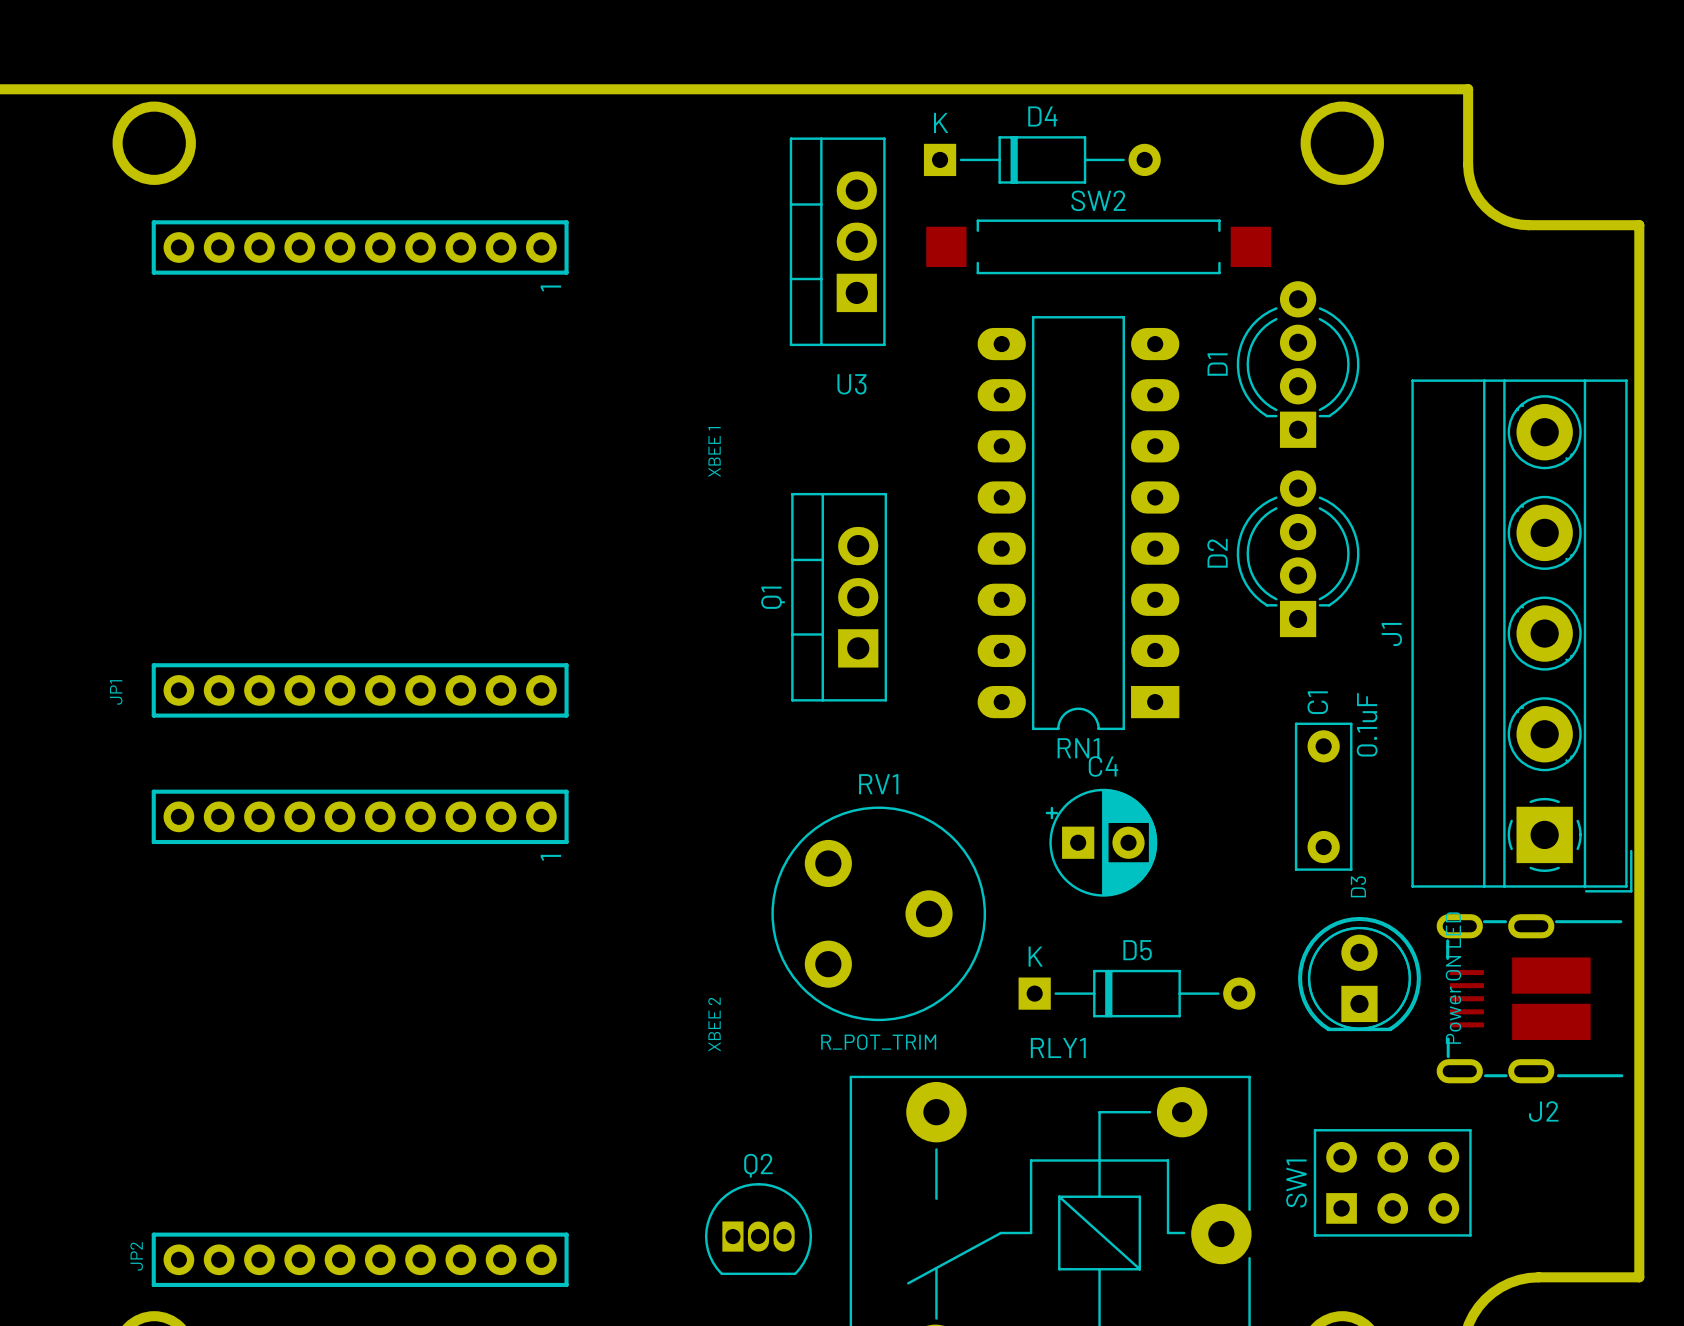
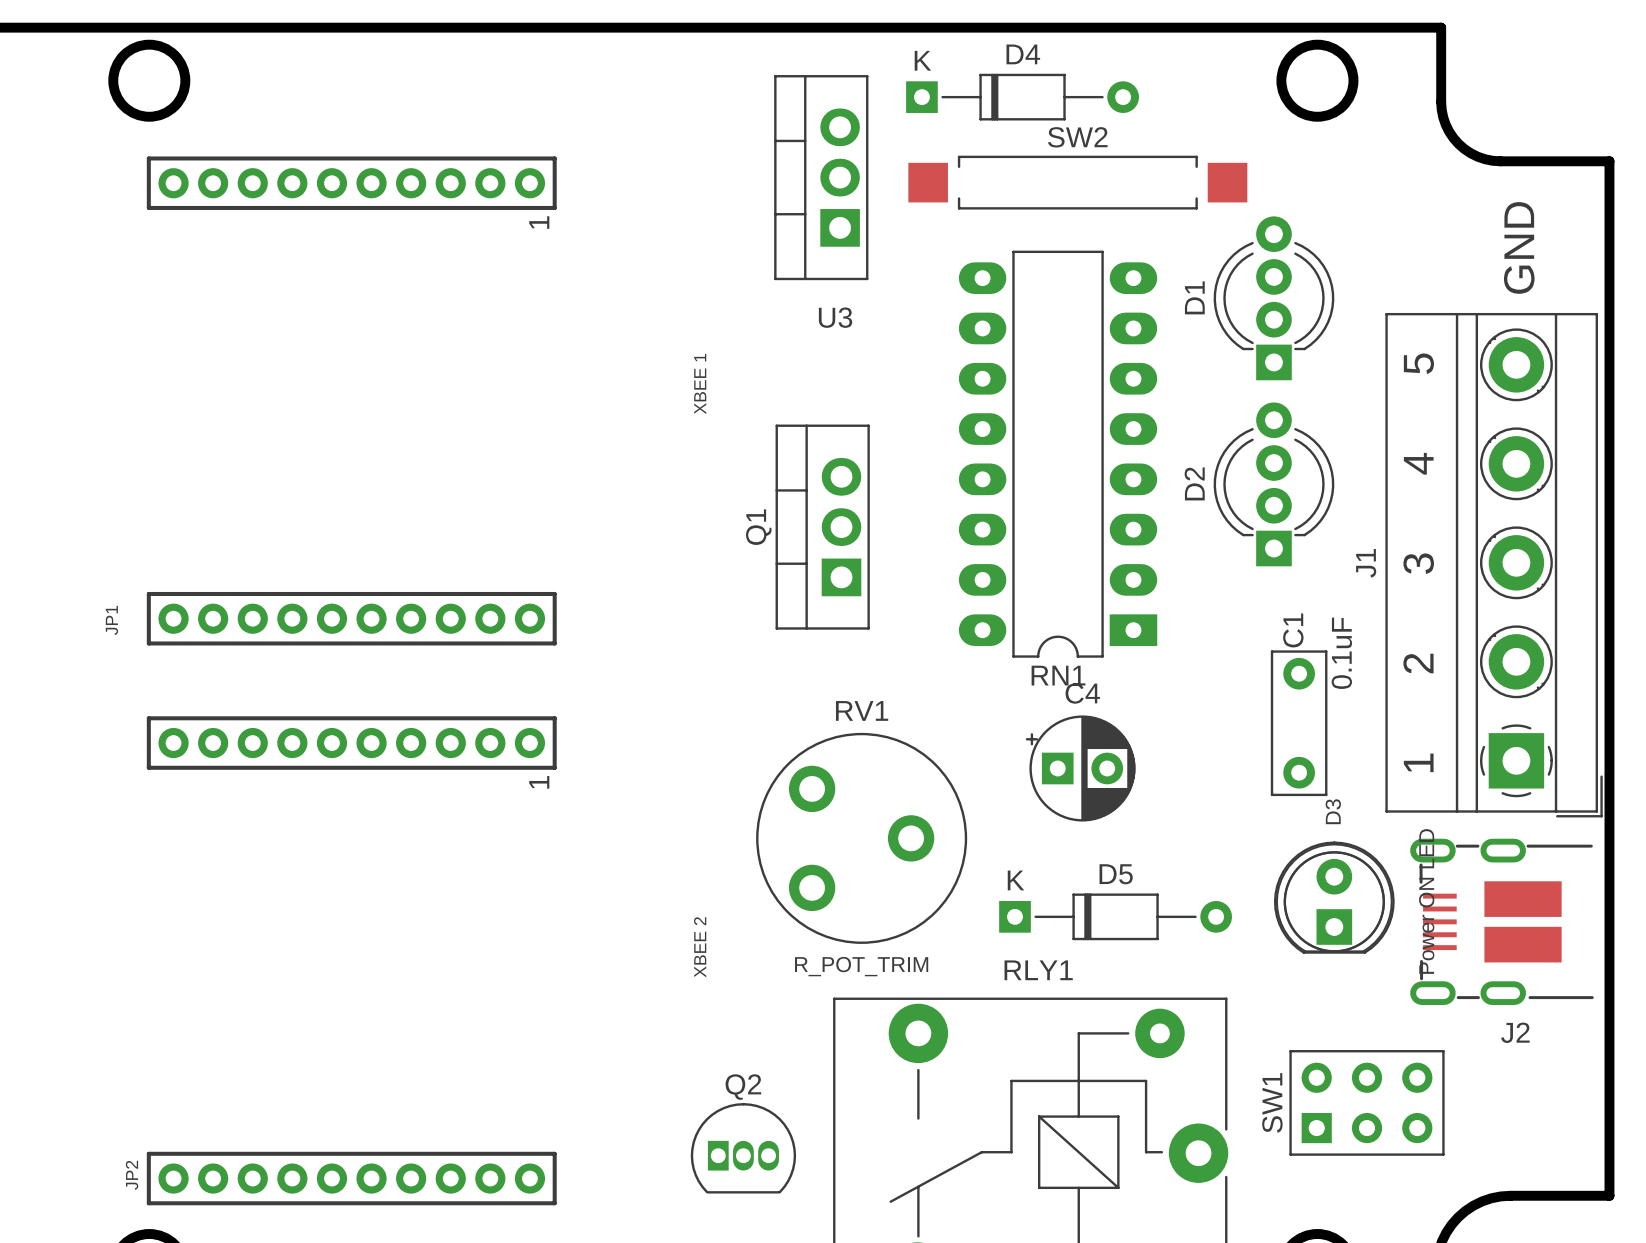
text: none -> GND (1519, 247)
text: none -> 5 (1418, 363)
text: none -> 4 (1418, 463)
text: none -> 3 (1418, 563)
text: none -> 2 (1418, 663)
text: none -> 1 (1418, 762)

